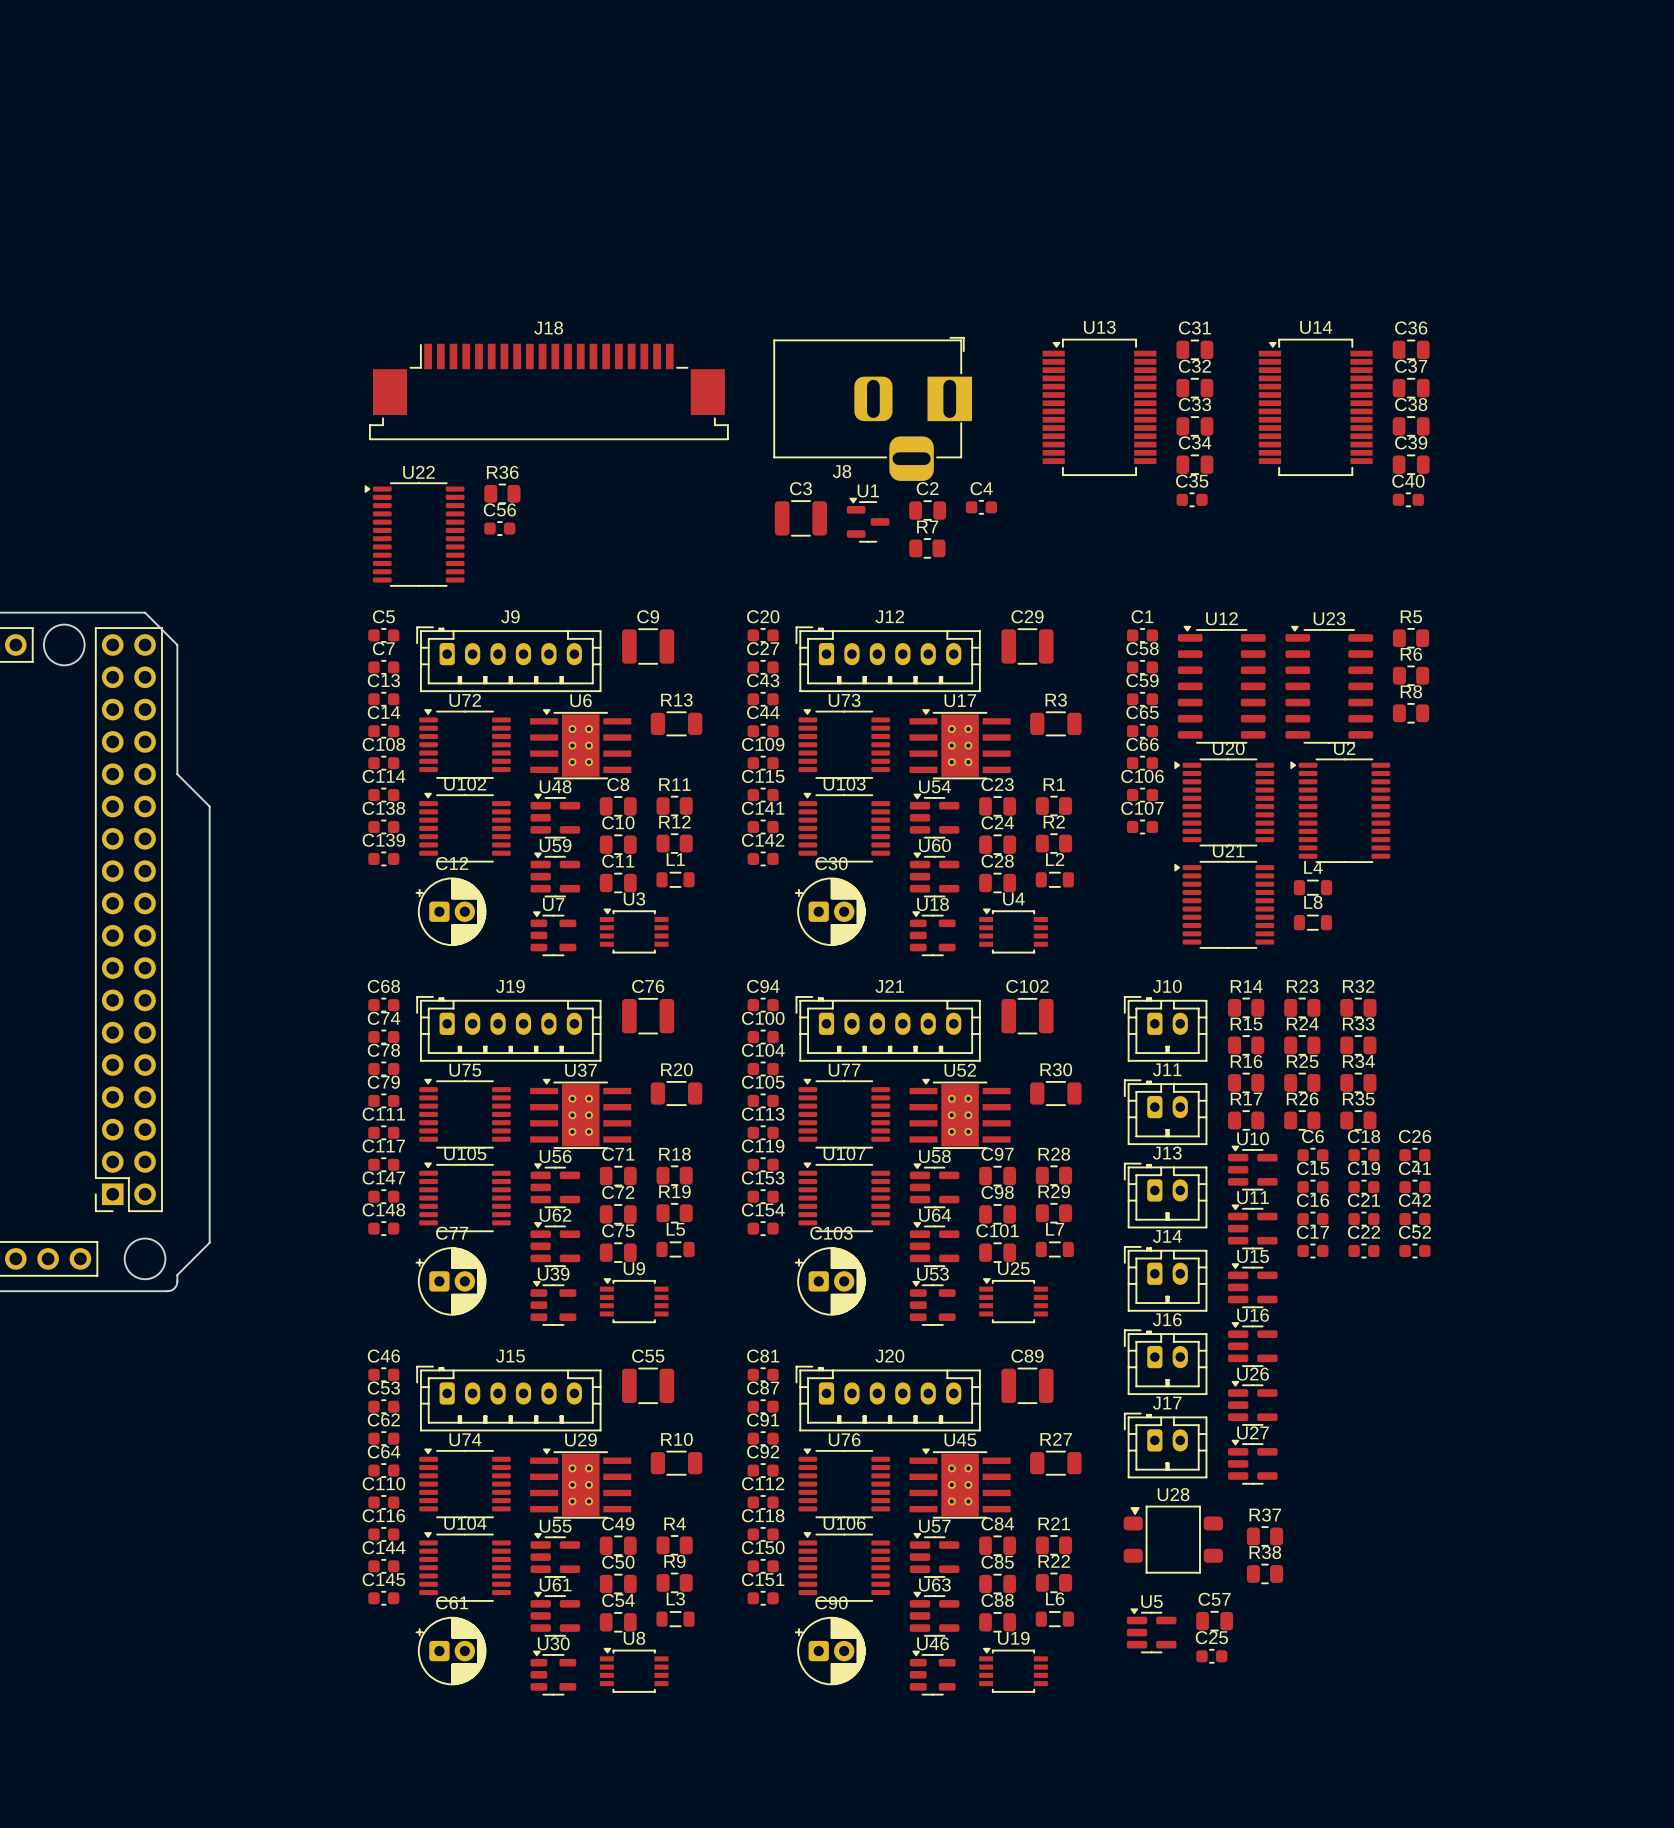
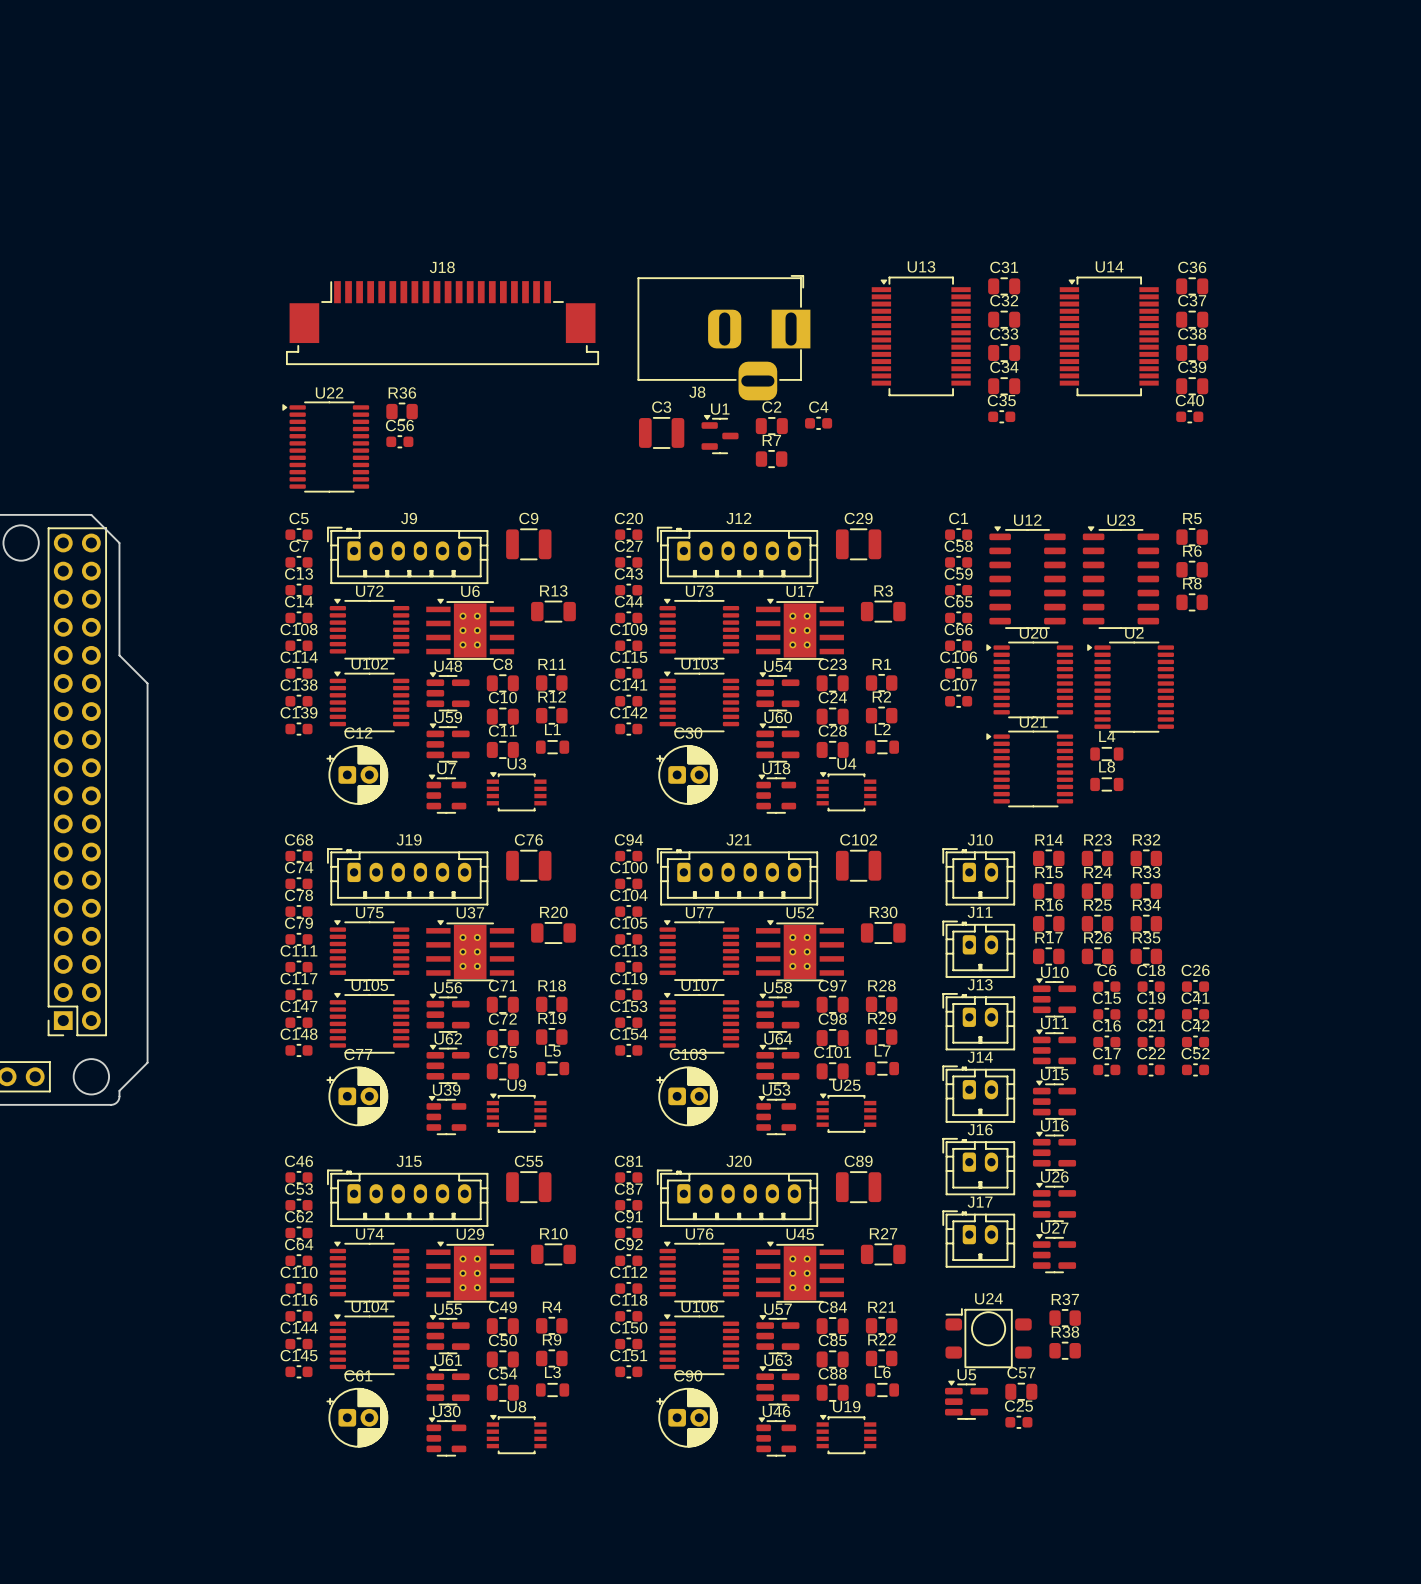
U28: (1173, 1539) -> none
U24: none -> (988, 1338)

